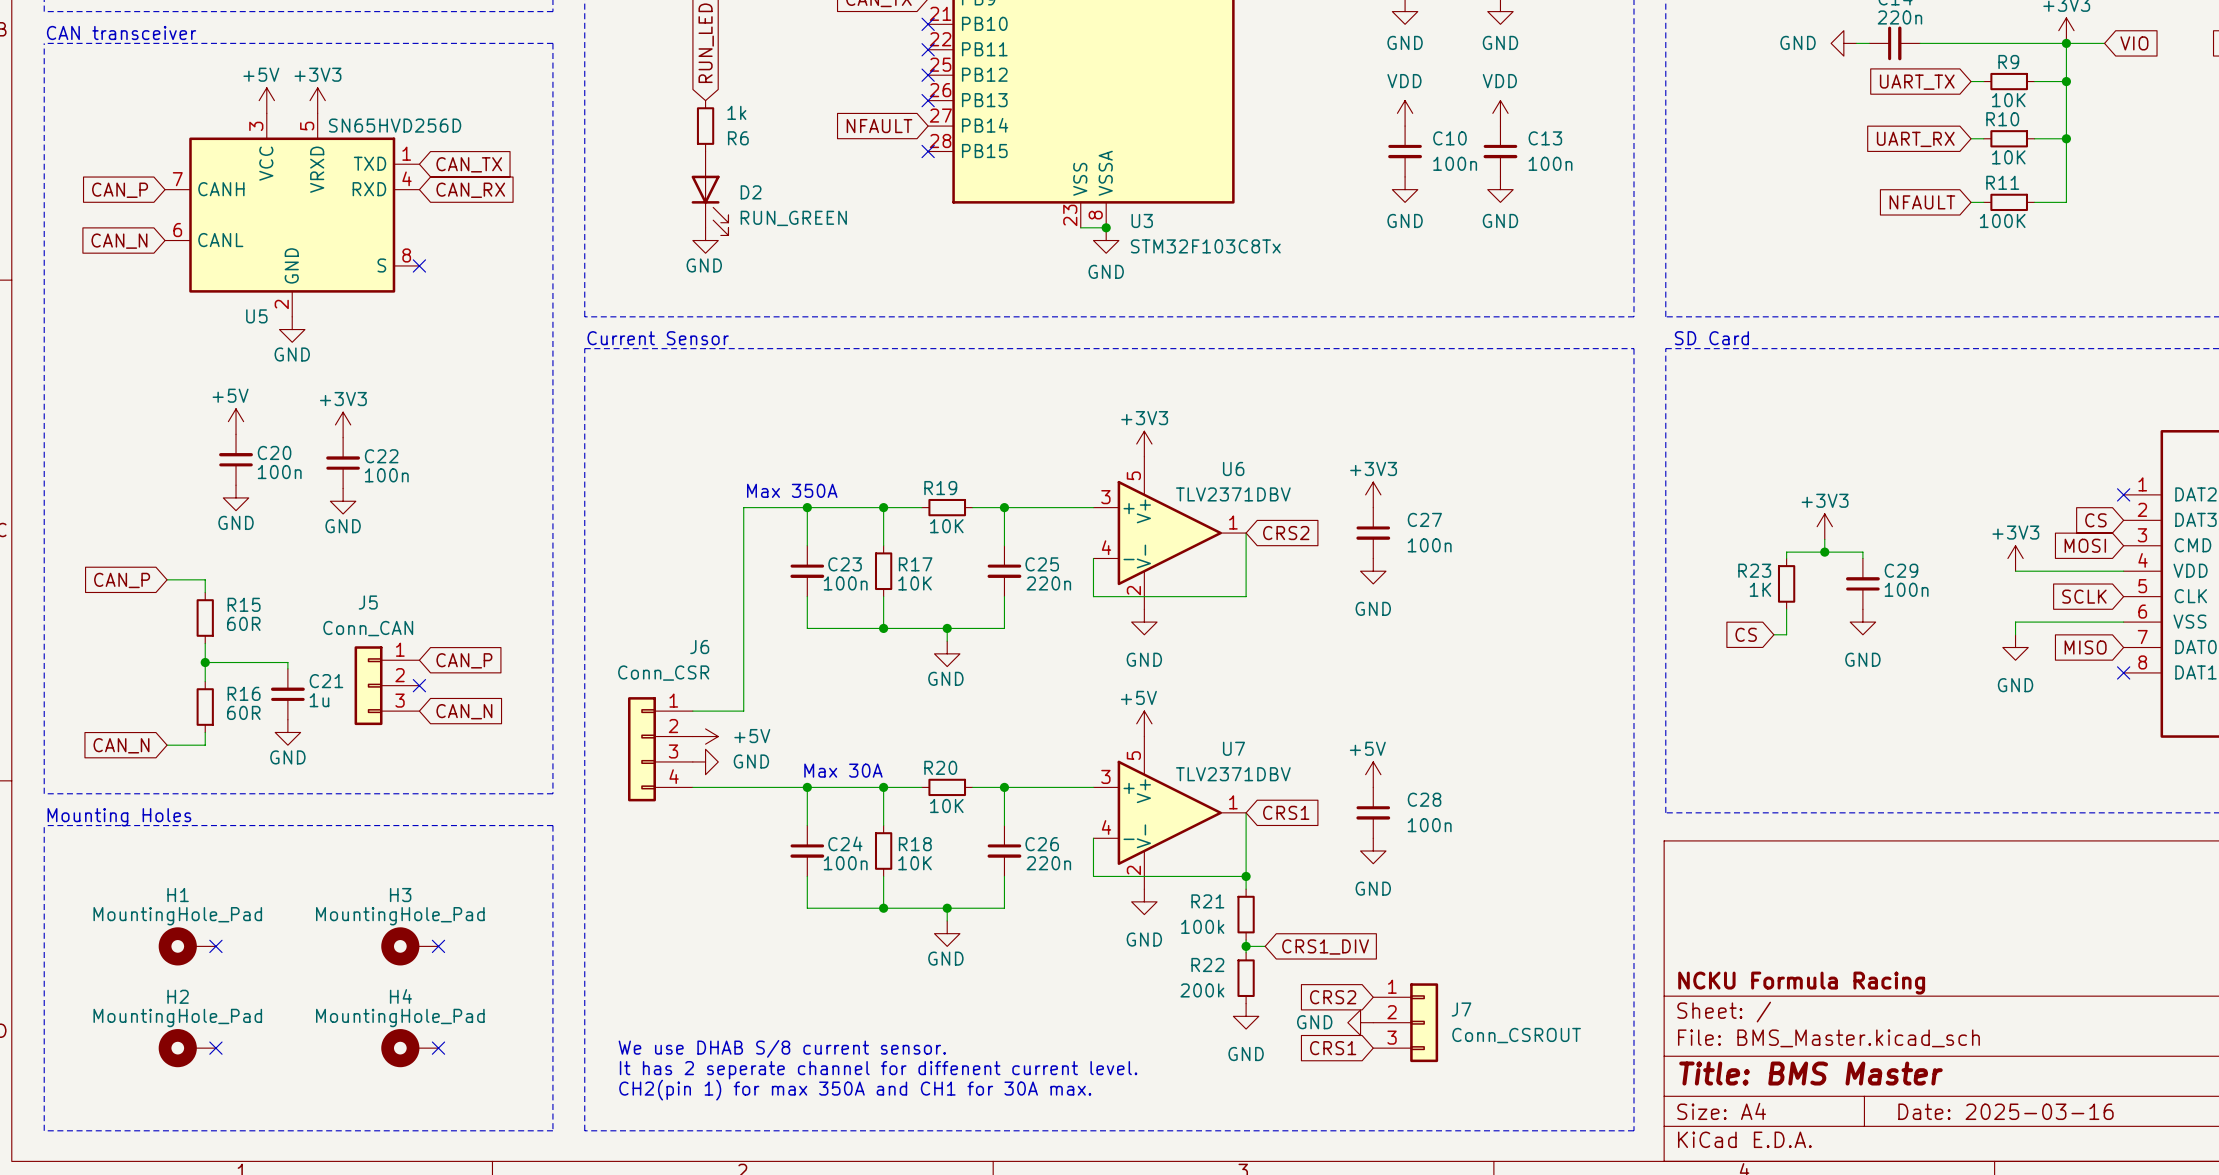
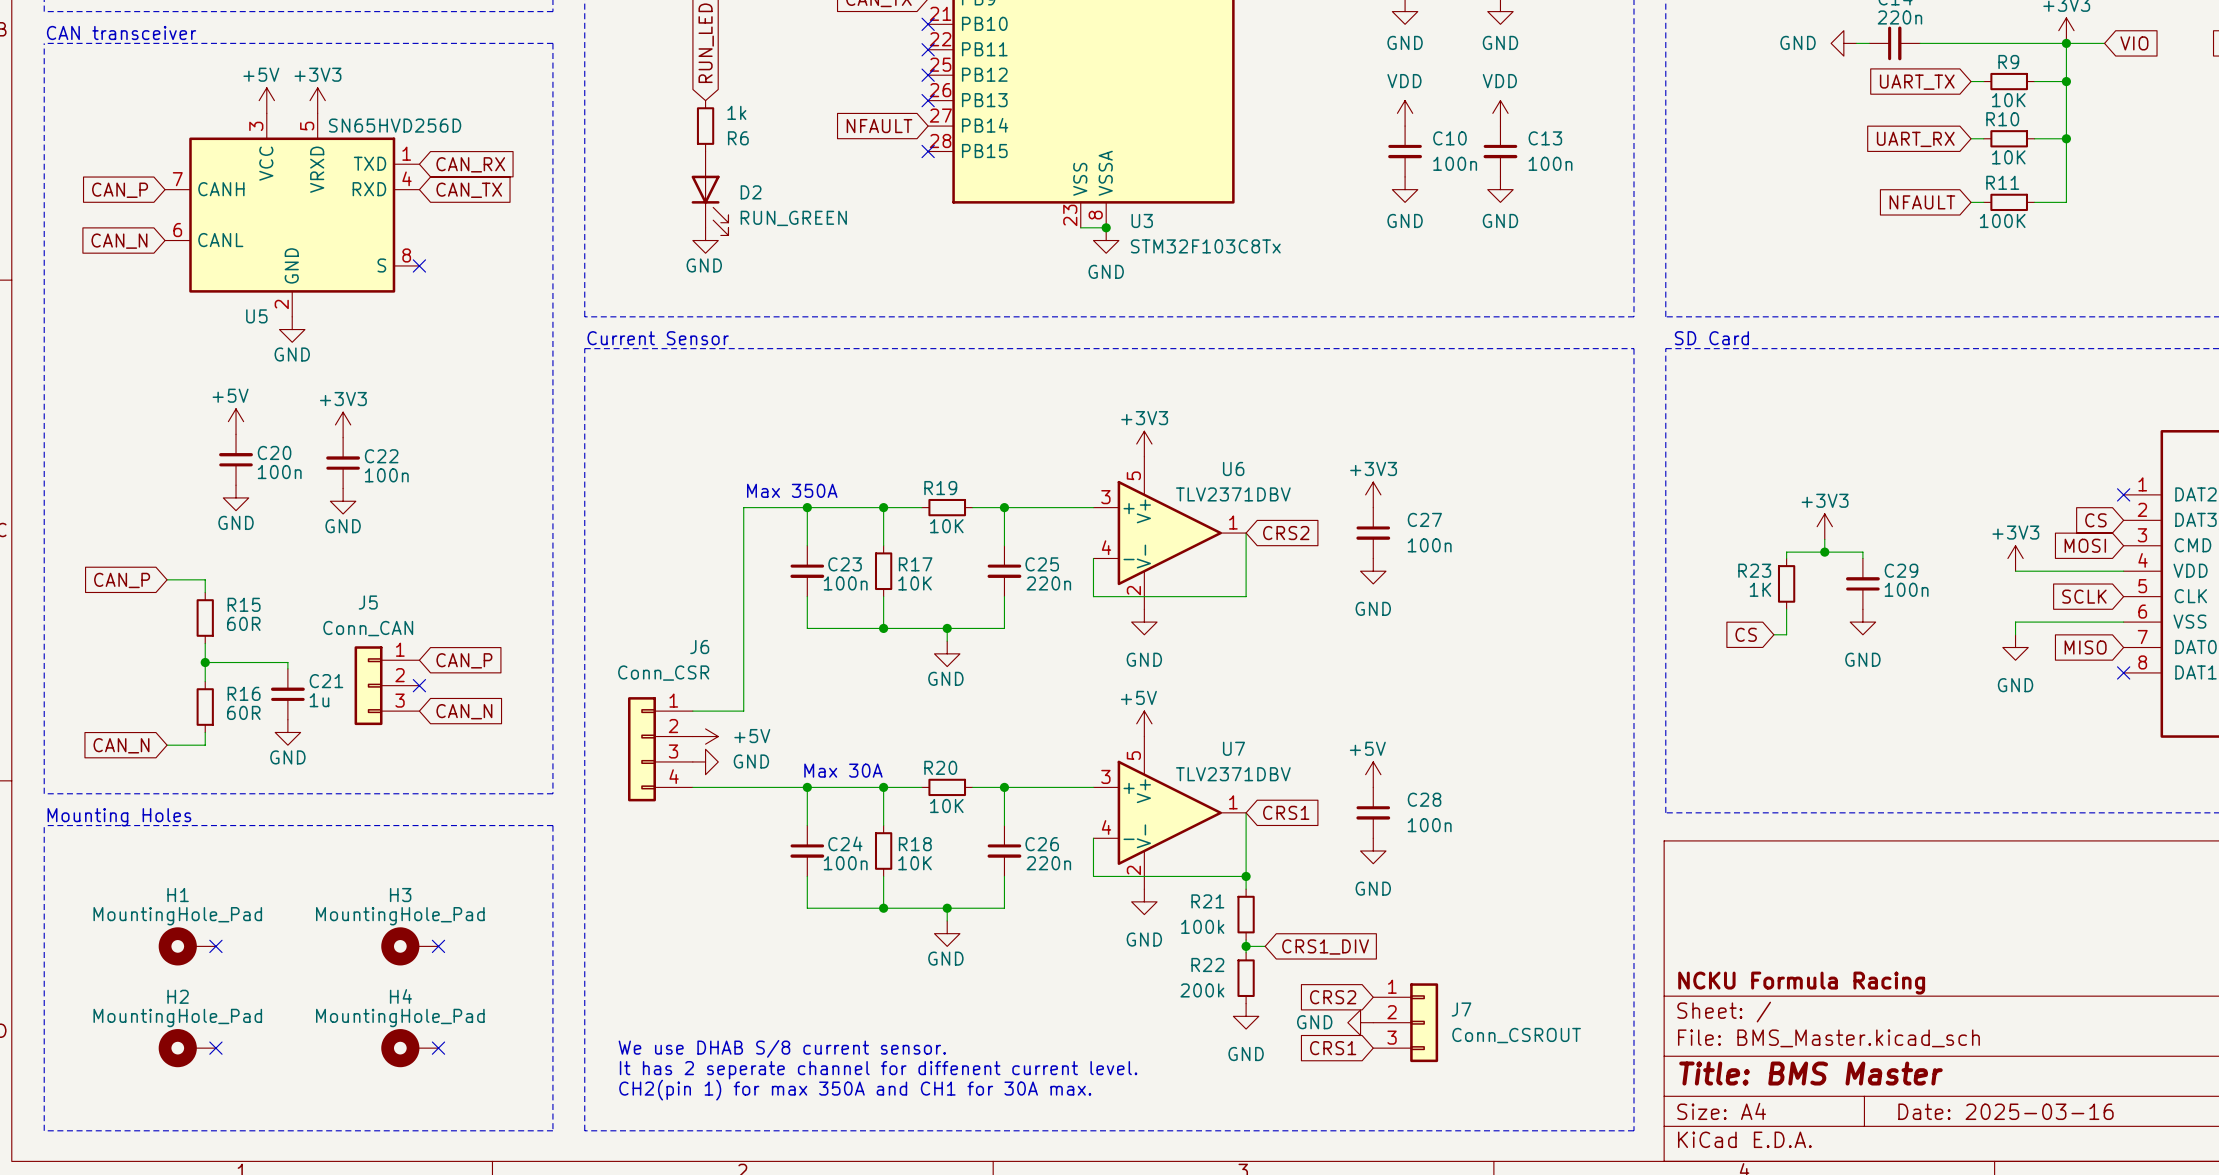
global label: CAN_TX (469, 164) -> CAN_RX (470, 164)
global label: CAN_RX (470, 190) -> CAN_TX (469, 190)

